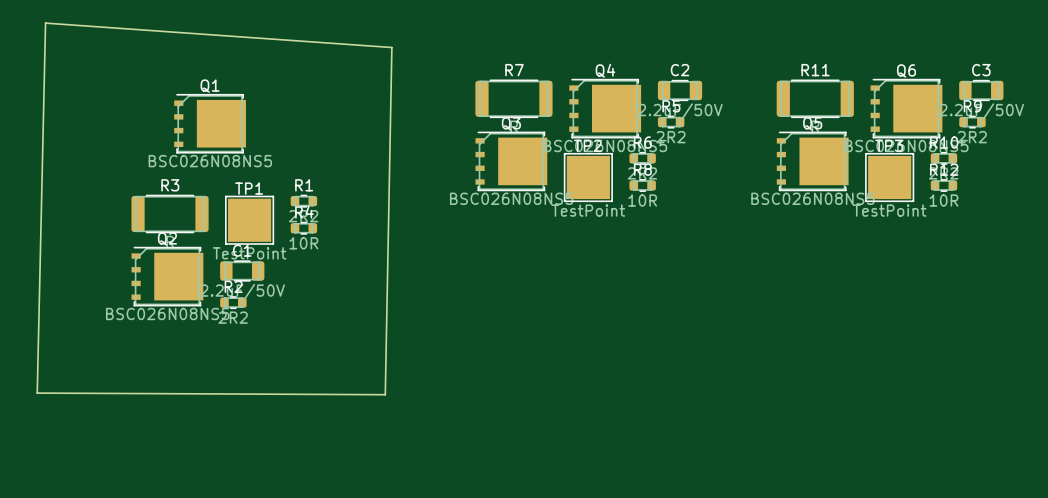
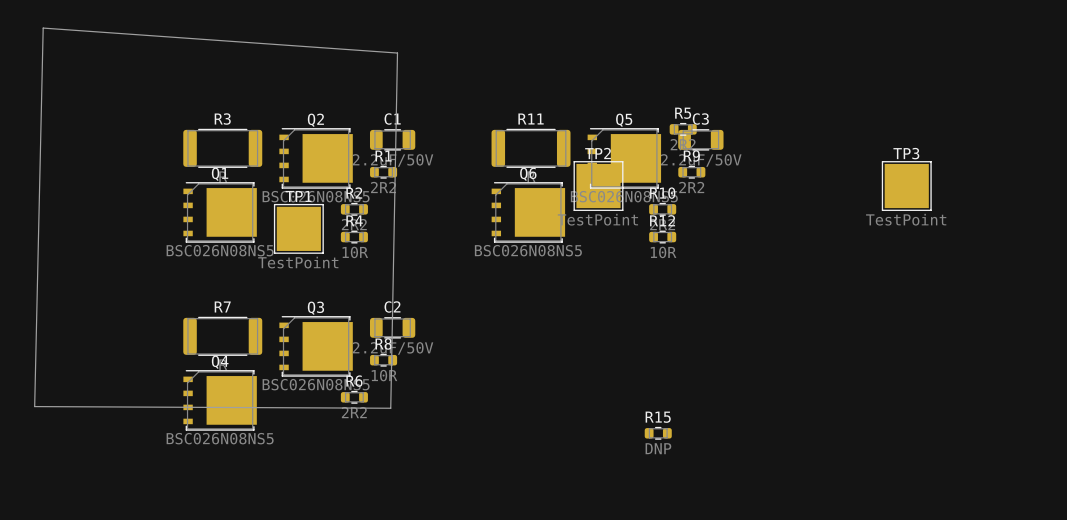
C2 position: (680, 90) -> (392, 327)
C3 position: (981, 90) -> (700, 139)
R7 position: (513, 98) -> (222, 336)
R11 position: (815, 98) -> (531, 148)
Q4 position: (605, 108) -> (220, 400)
Q6 position: (906, 108) -> (528, 212)
R9 position: (972, 122) -> (691, 172)
Q1 position: (210, 123) -> (220, 212)
R6 position: (642, 158) -> (354, 397)
R10 position: (943, 158) -> (662, 209)
Q3 position: (511, 161) -> (316, 346)
Q5 position: (812, 161) -> (624, 158)
R8 position: (642, 185) -> (383, 360)
R12 position: (943, 185) -> (662, 237)
R1 position: (303, 201) -> (383, 172)
R3 position: (170, 213) -> (222, 148)
TP1 position: (249, 220) -> (298, 228)
R4 position: (303, 228) -> (354, 237)
C1 position: (242, 270) -> (392, 139)
Q2 position: (167, 276) -> (316, 158)
R2 position: (233, 302) -> (354, 209)
R15: none -> DNP (658, 433)

